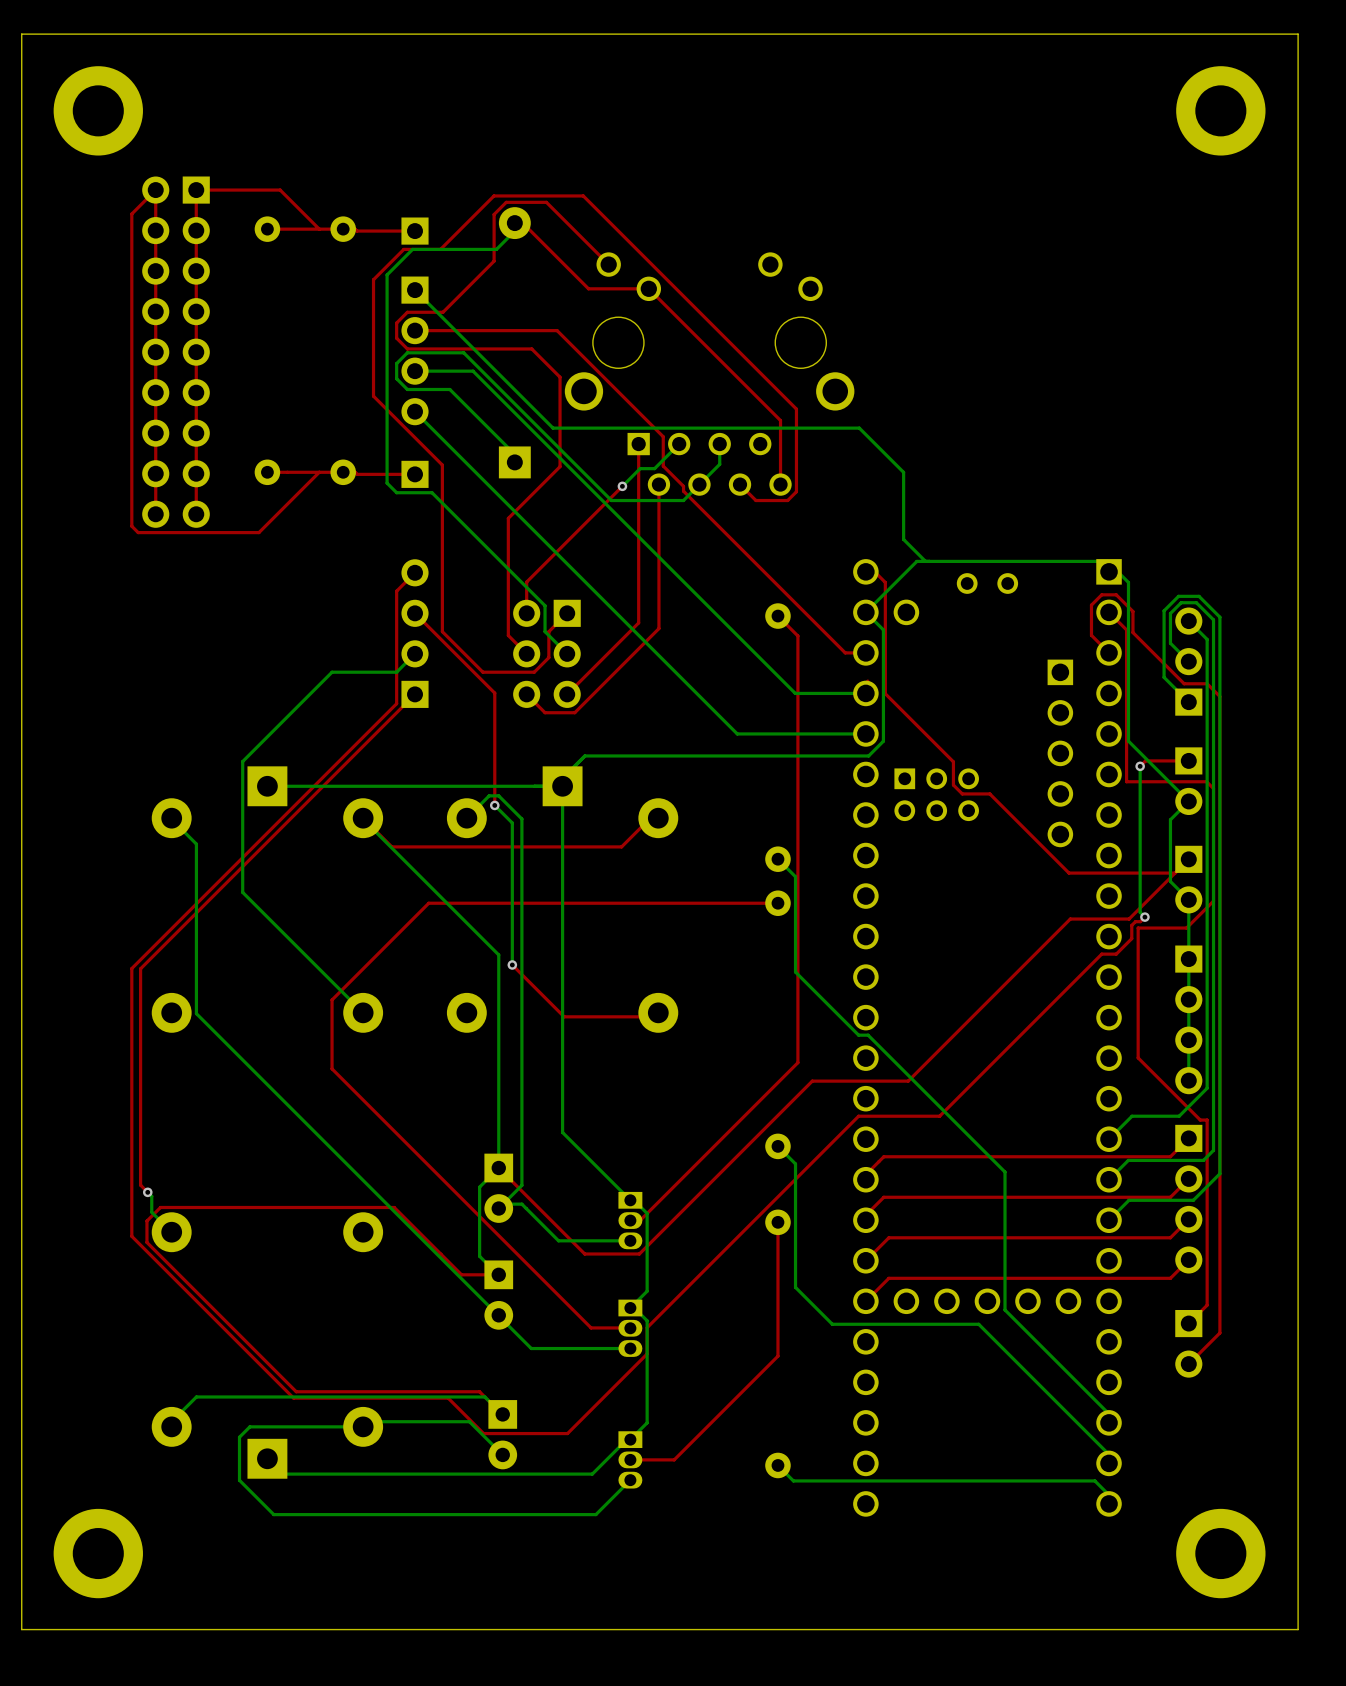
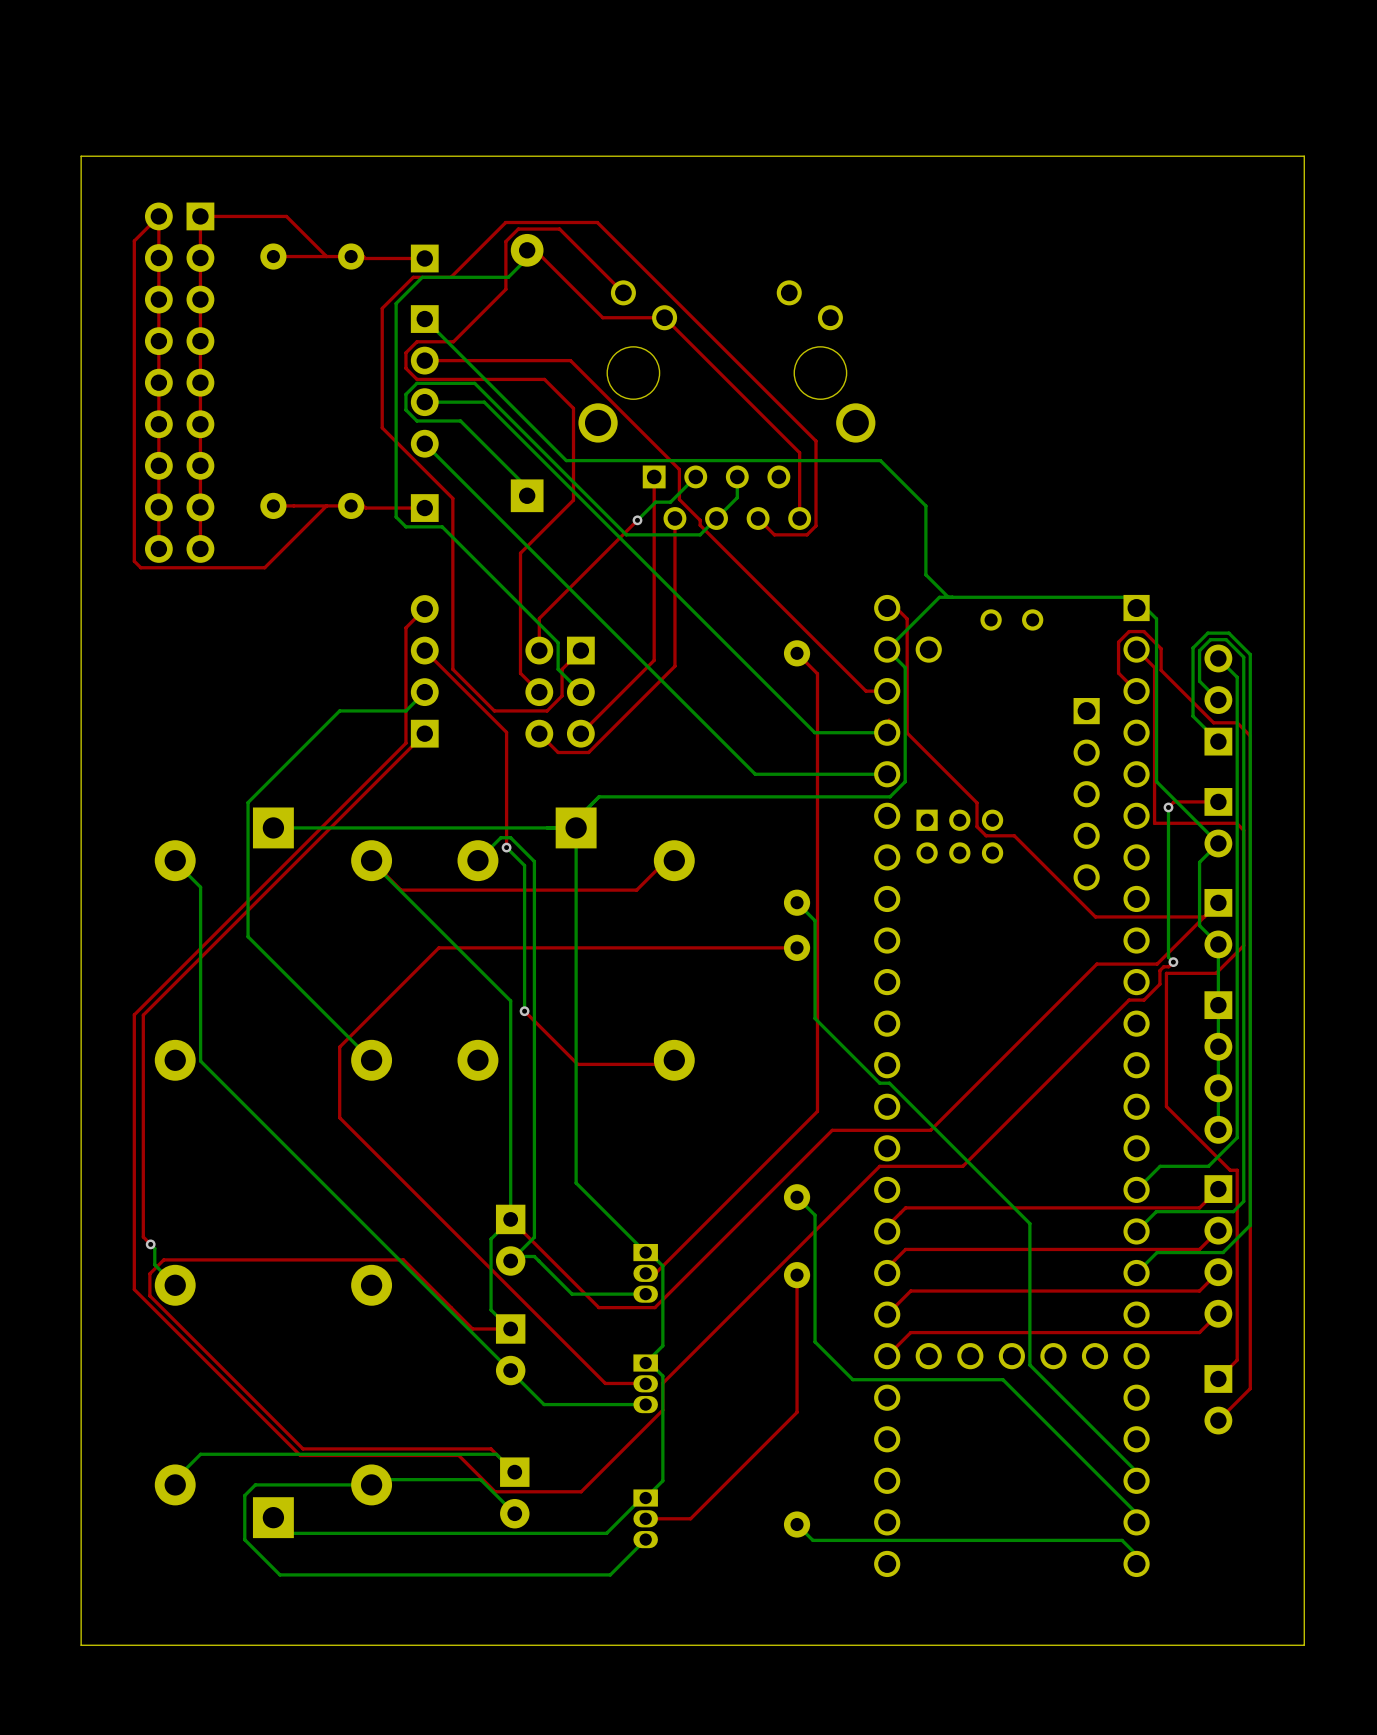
board edge: (1298, 34) (21, 34) (21, 1629) (1298, 1629) (1298, 34) -> (1304, 156) (1304, 1645) (81, 1645) (81, 156) (1304, 156)
part: (98, 110) -> none
part: (1220, 110) -> none
part: (98, 1553) -> none
part: (1220, 1553) -> none

